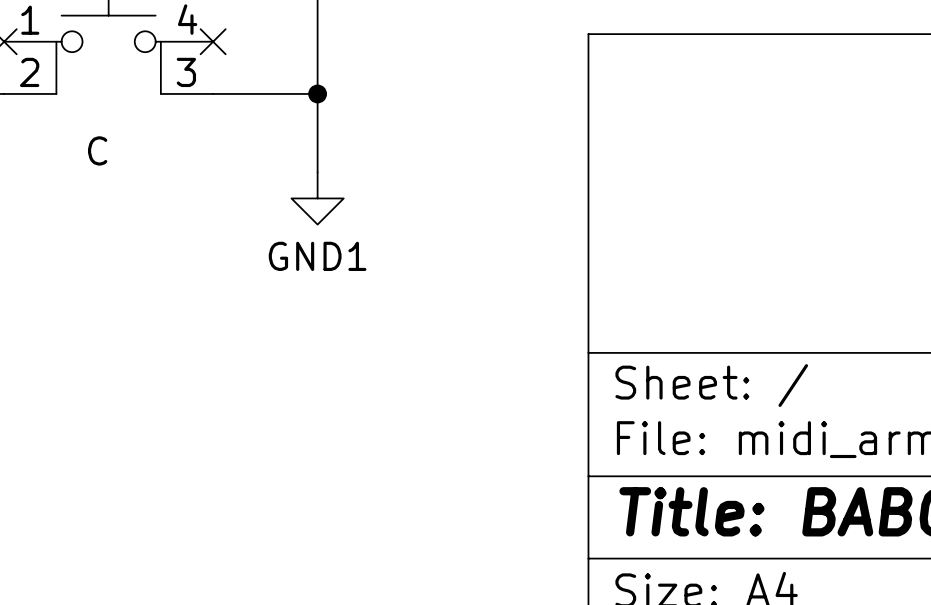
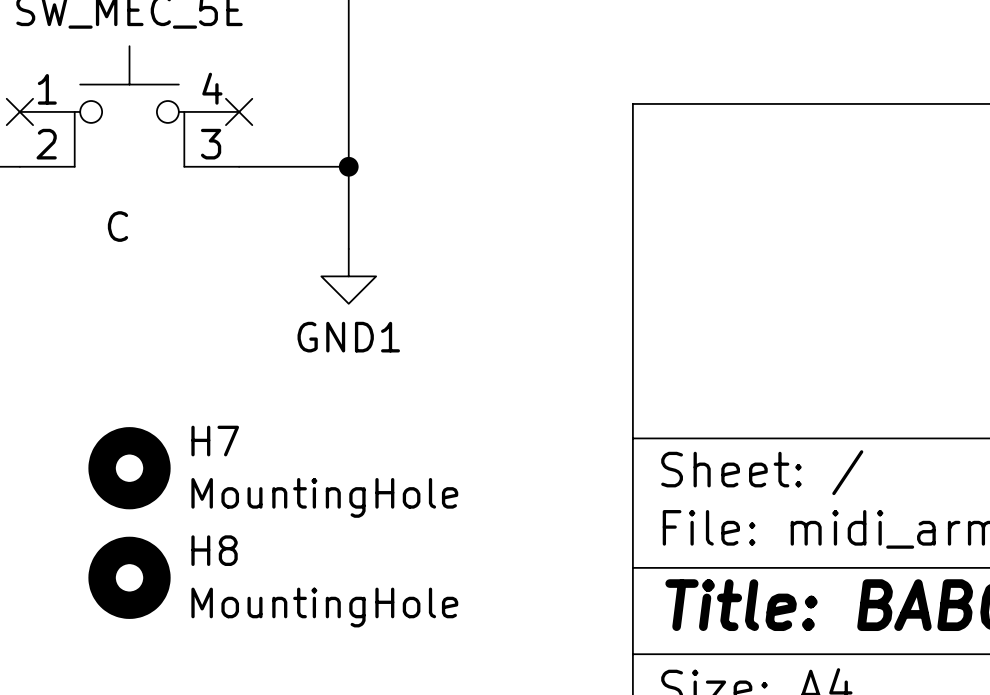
H7: none -> MountingHole (129, 468)
H8: none -> MountingHole (129, 577)

